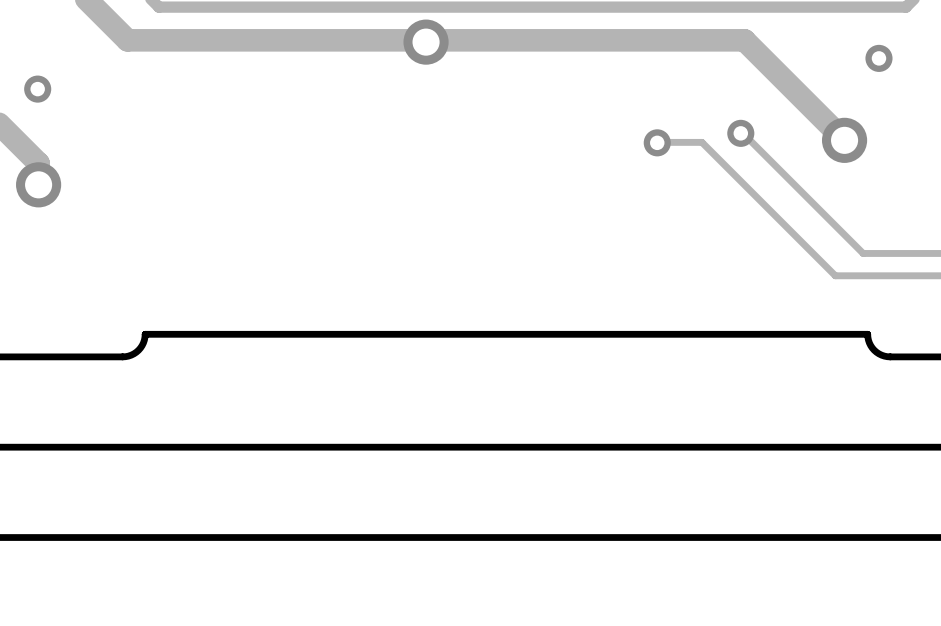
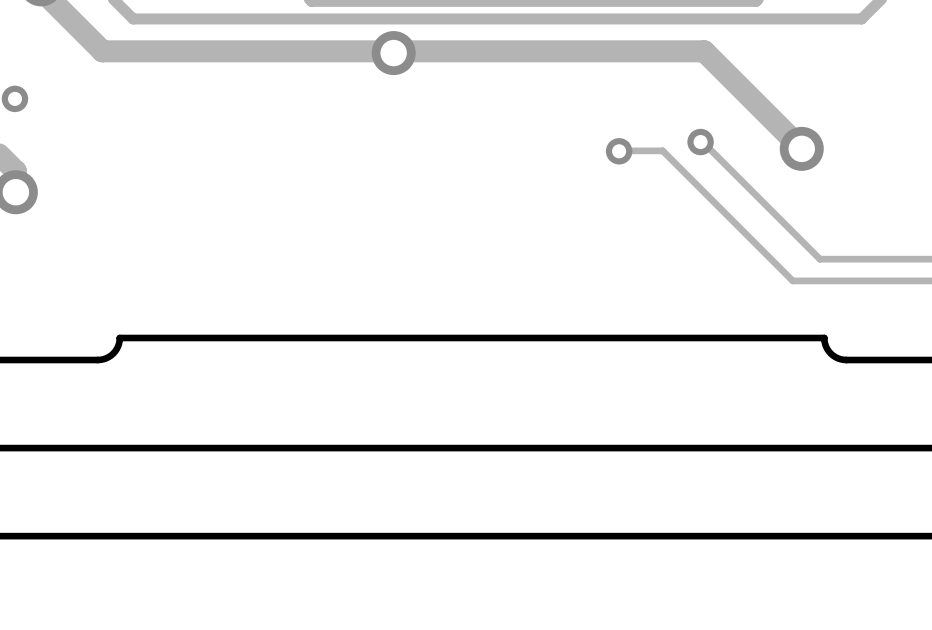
via: (878, 58) -> none

